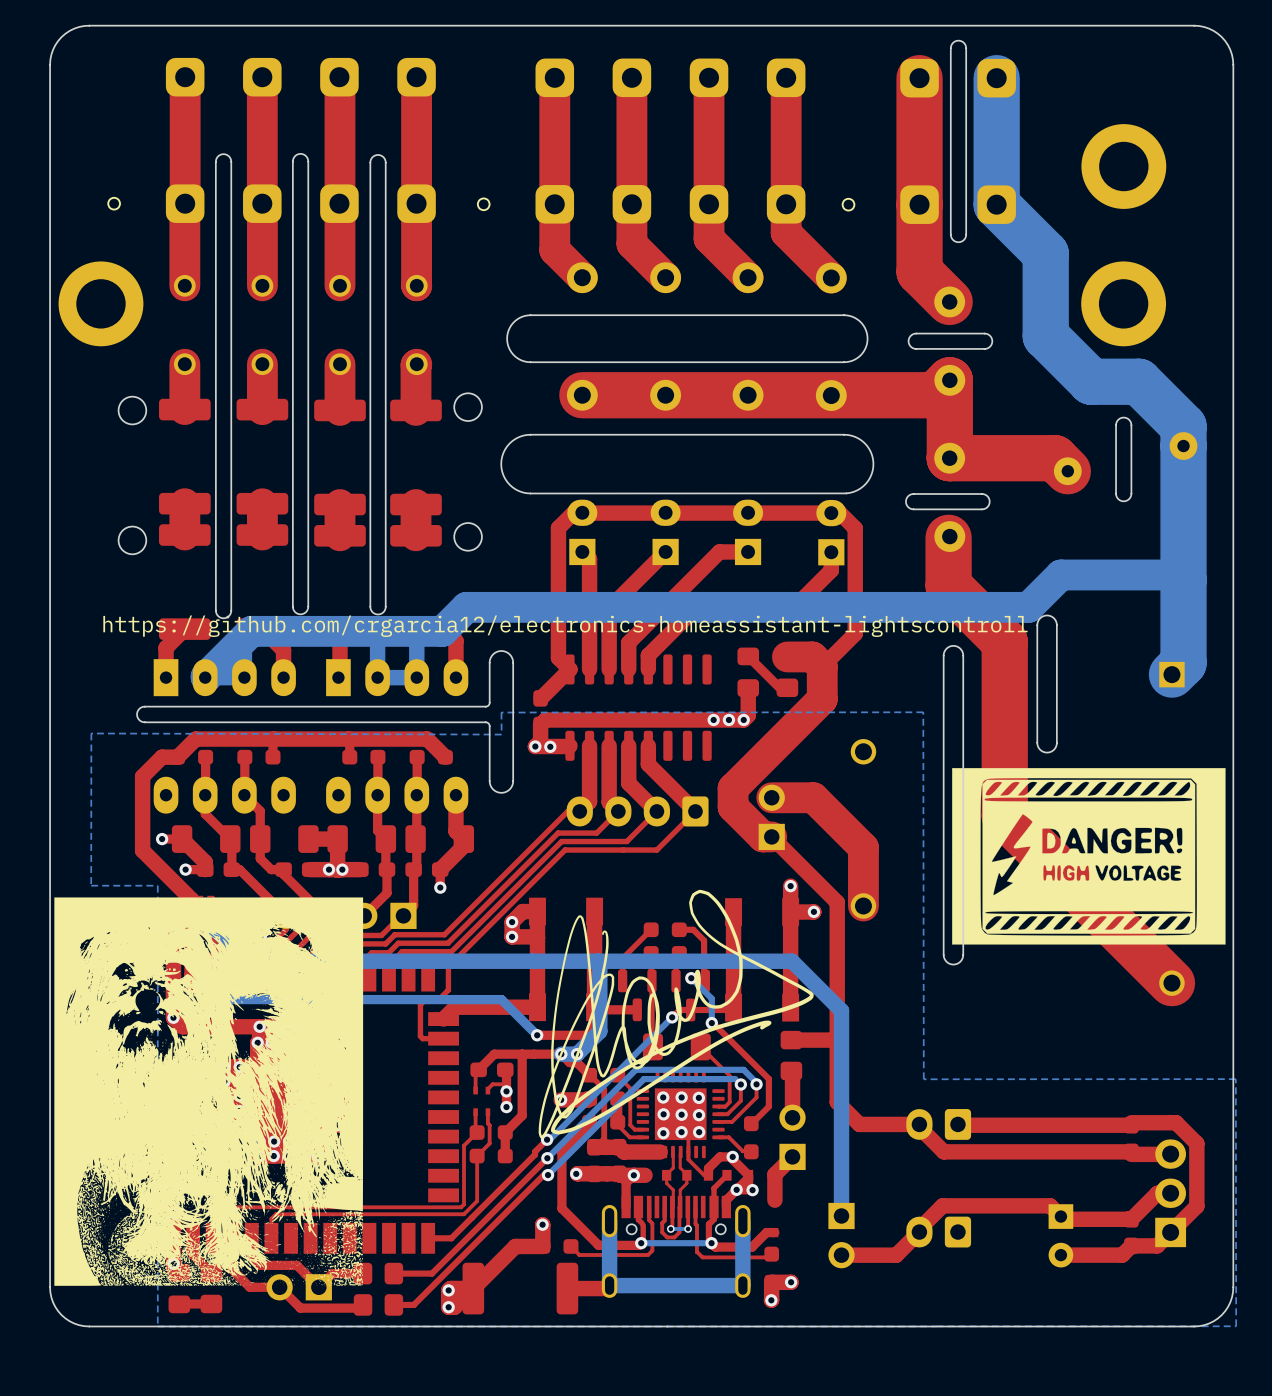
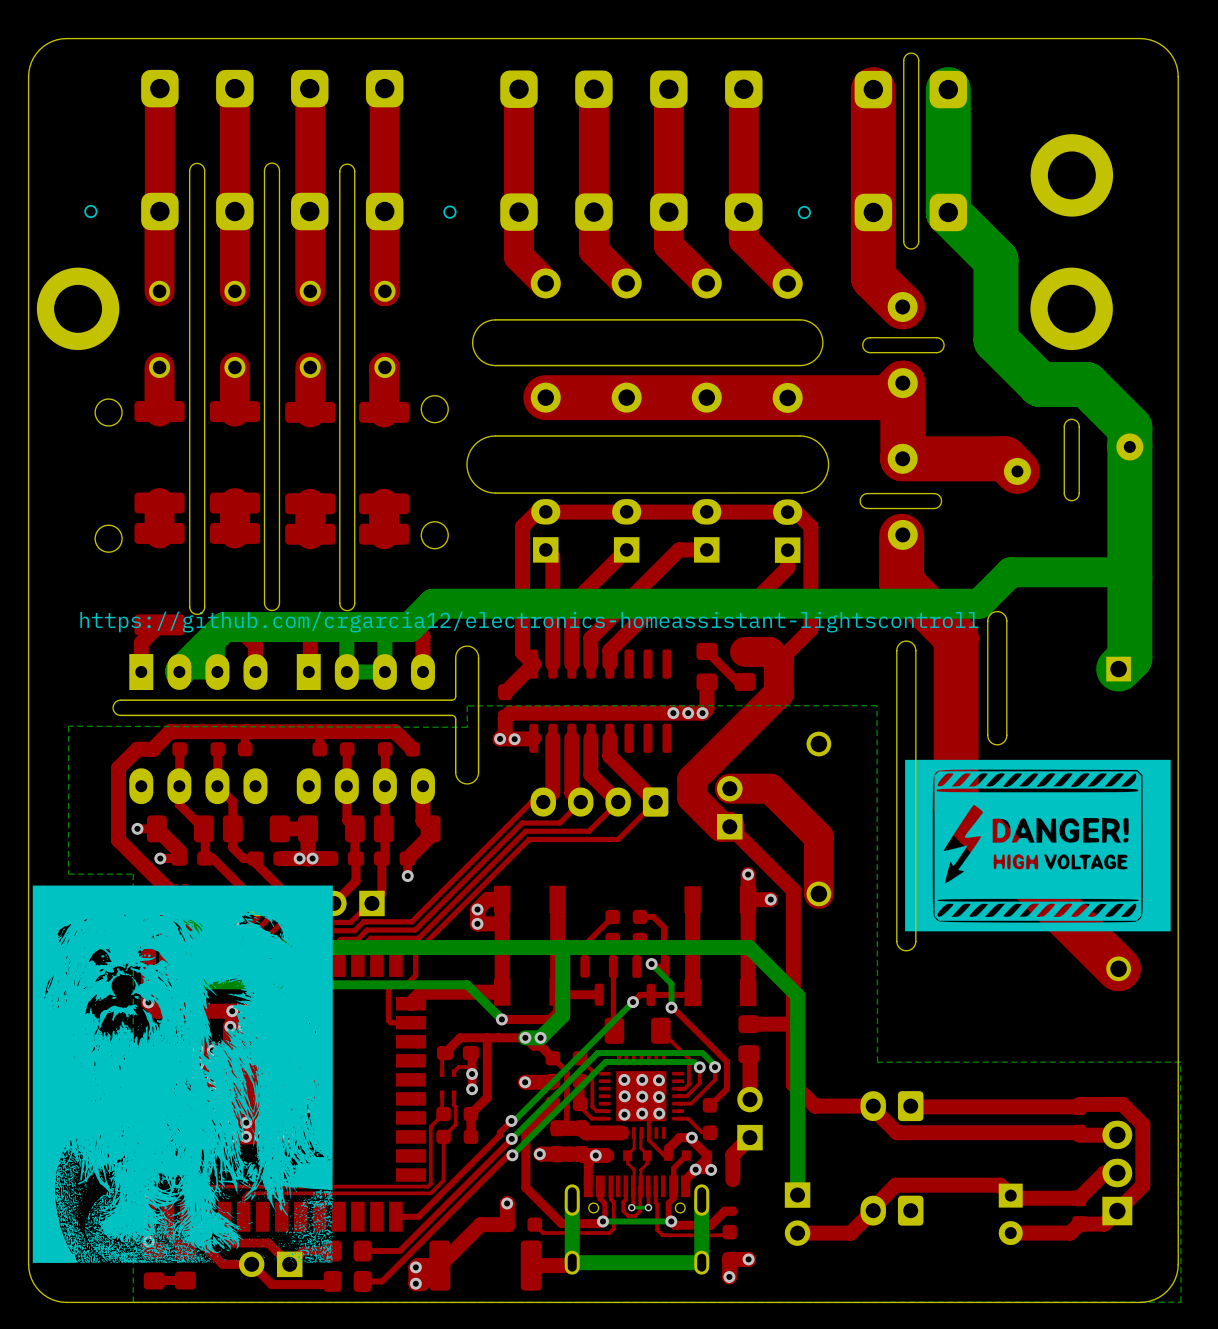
drawing: [538, 889, 814, 1139] -> none

